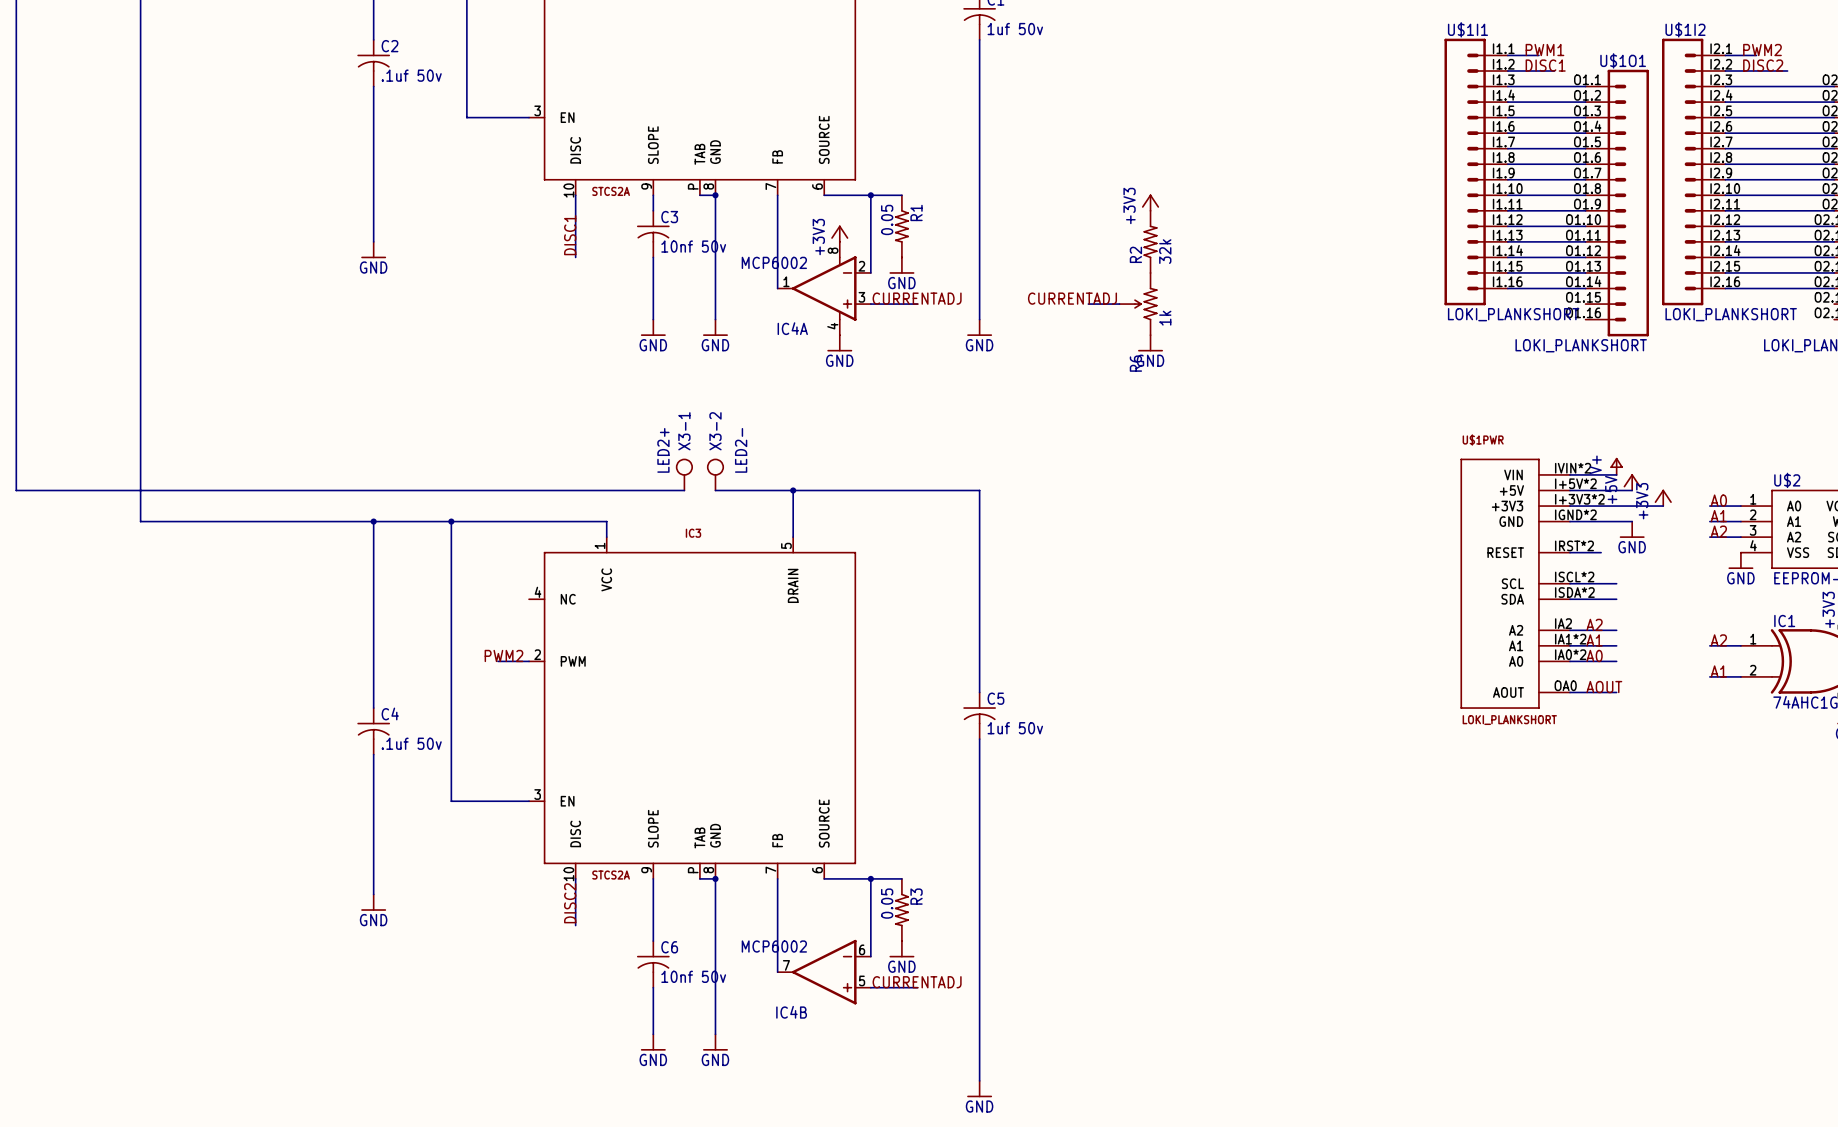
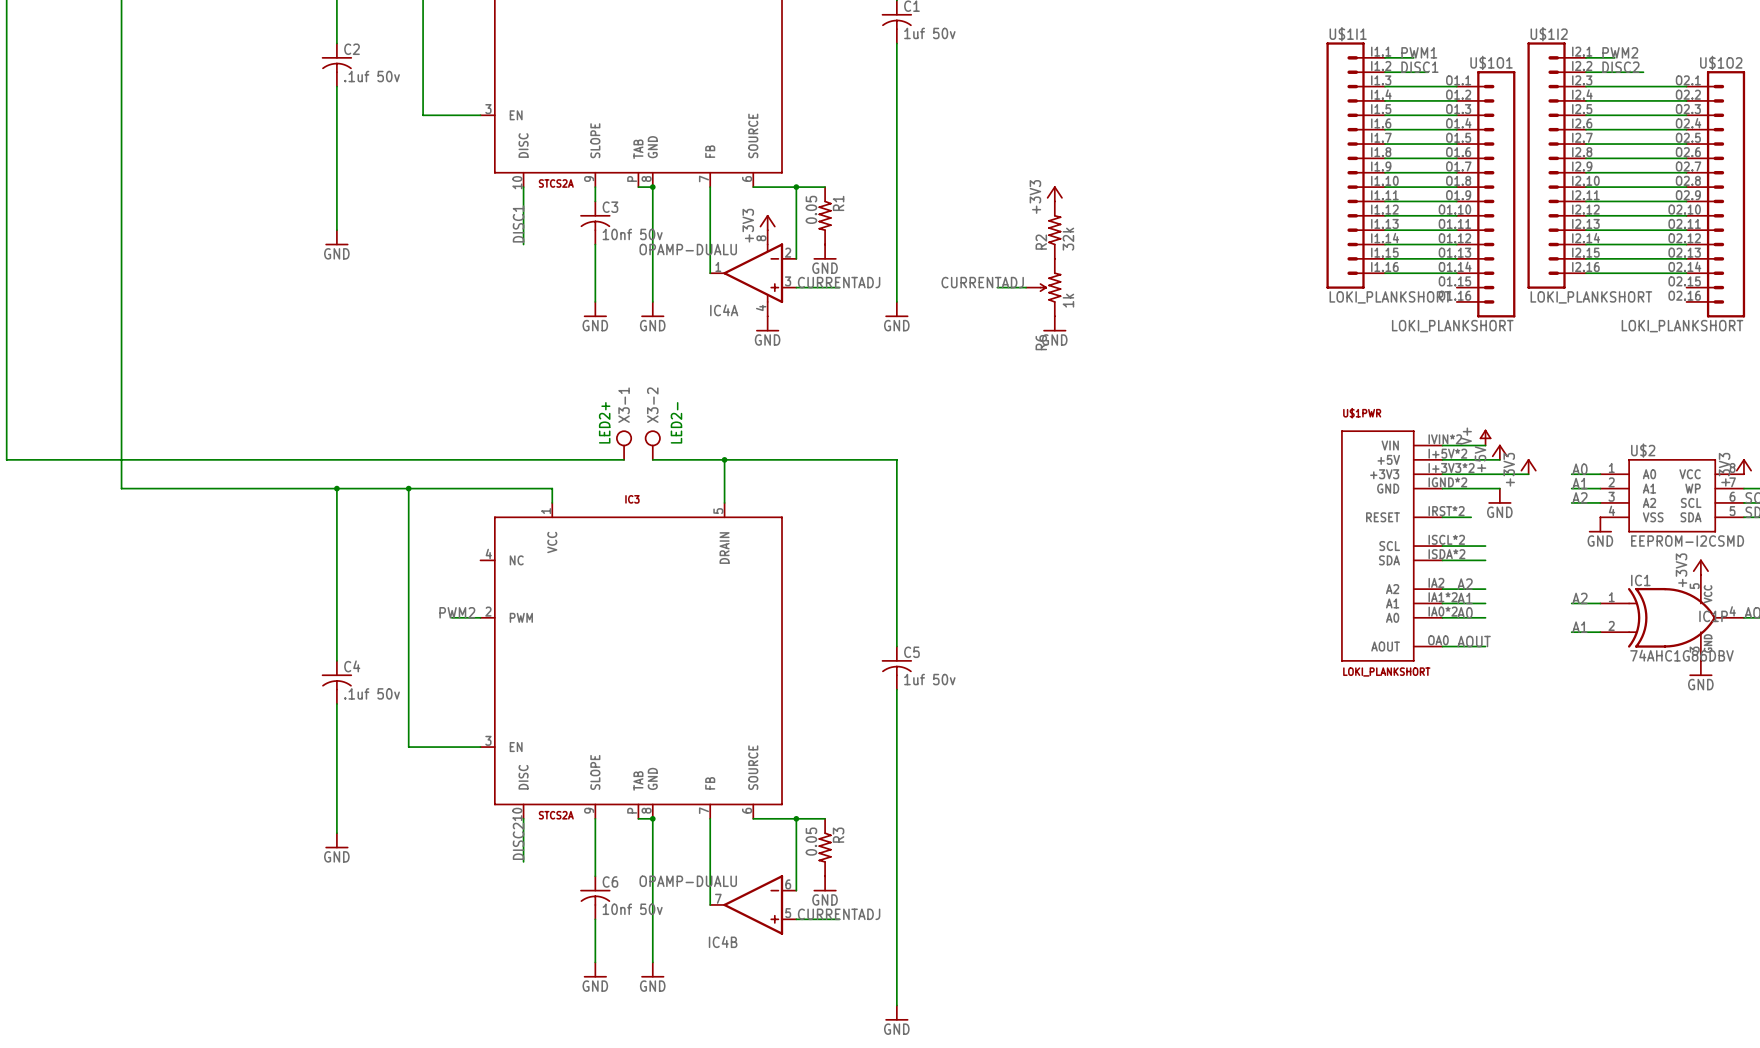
IC4A value: MCP6002 (774, 262) -> OPAMP-DUALU (688, 249)
IC4B value: MCP6002 (774, 946) -> OPAMP-DUALU (688, 881)

